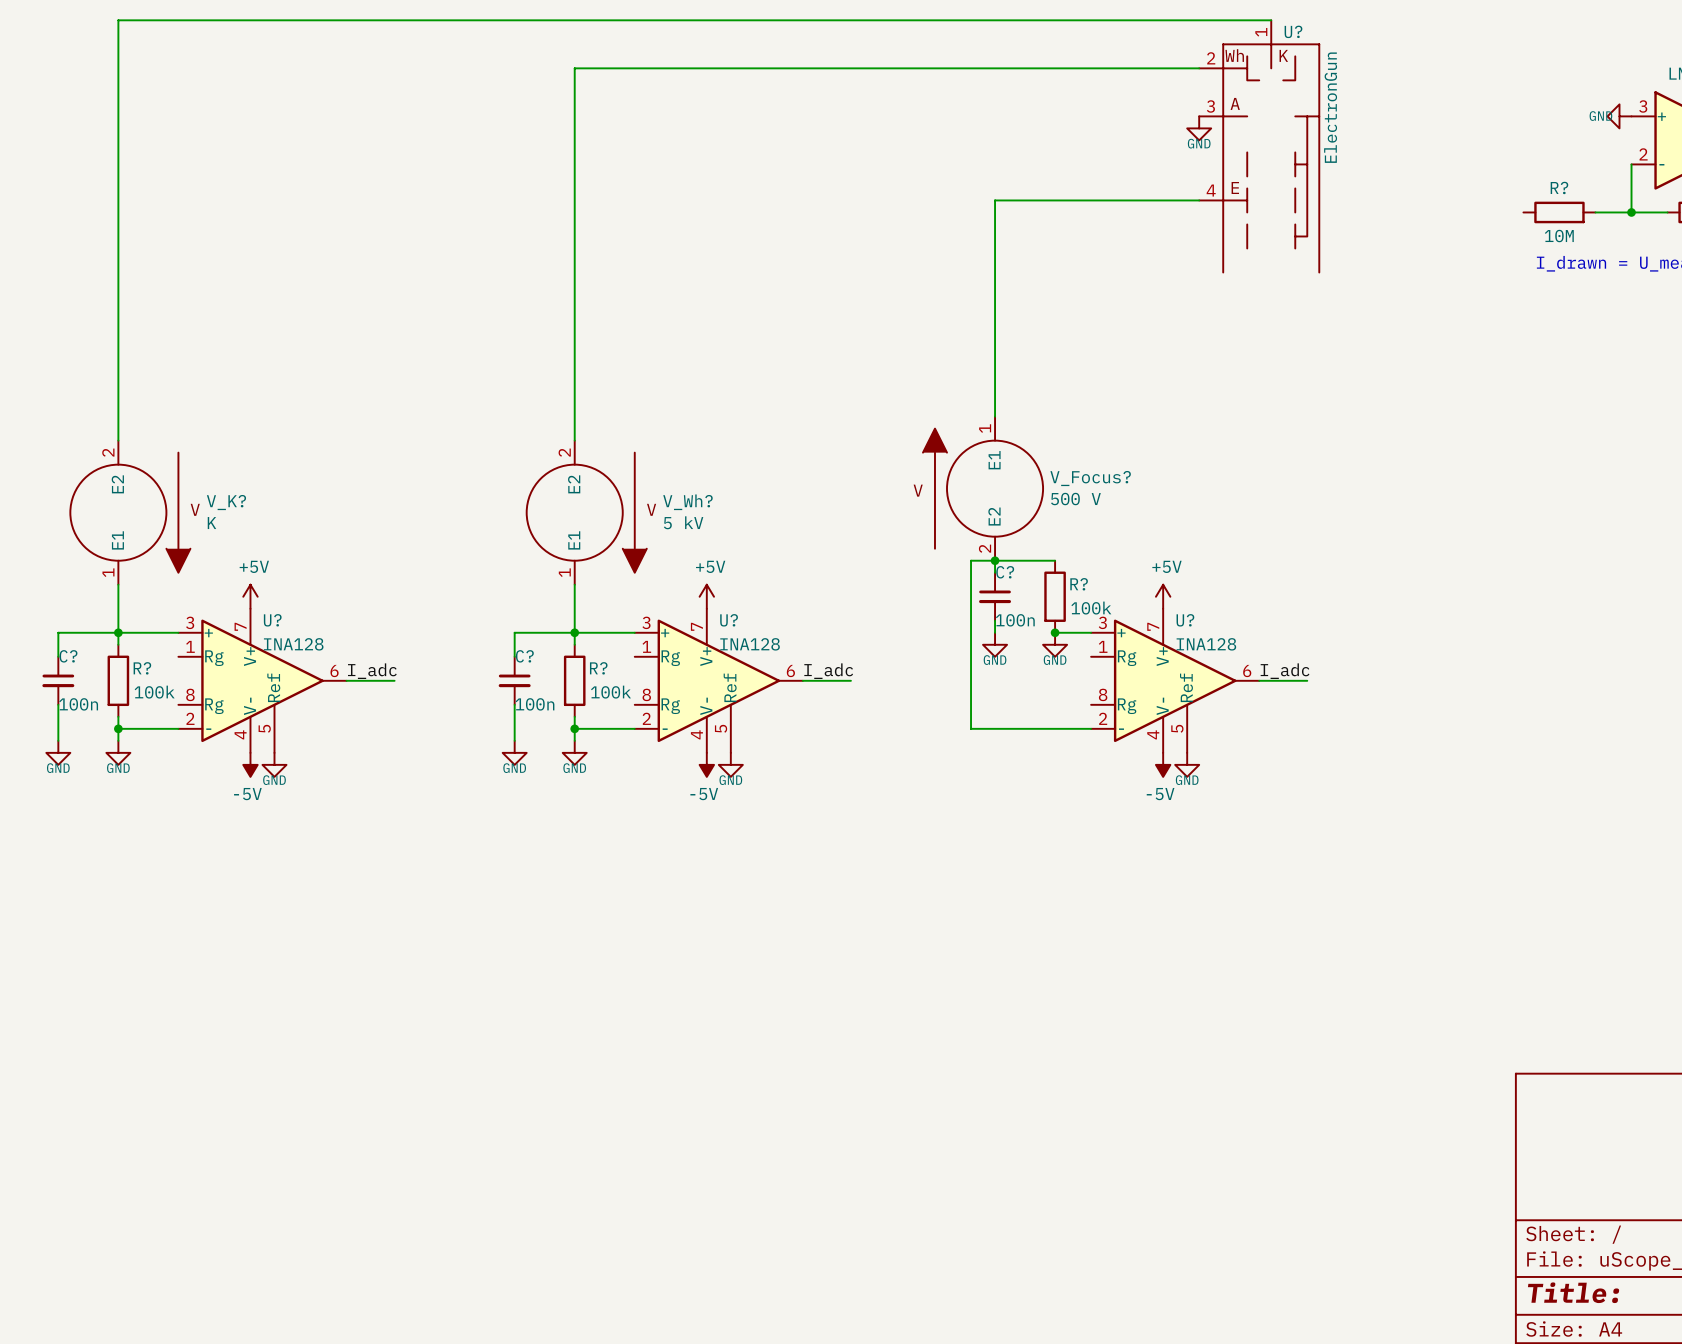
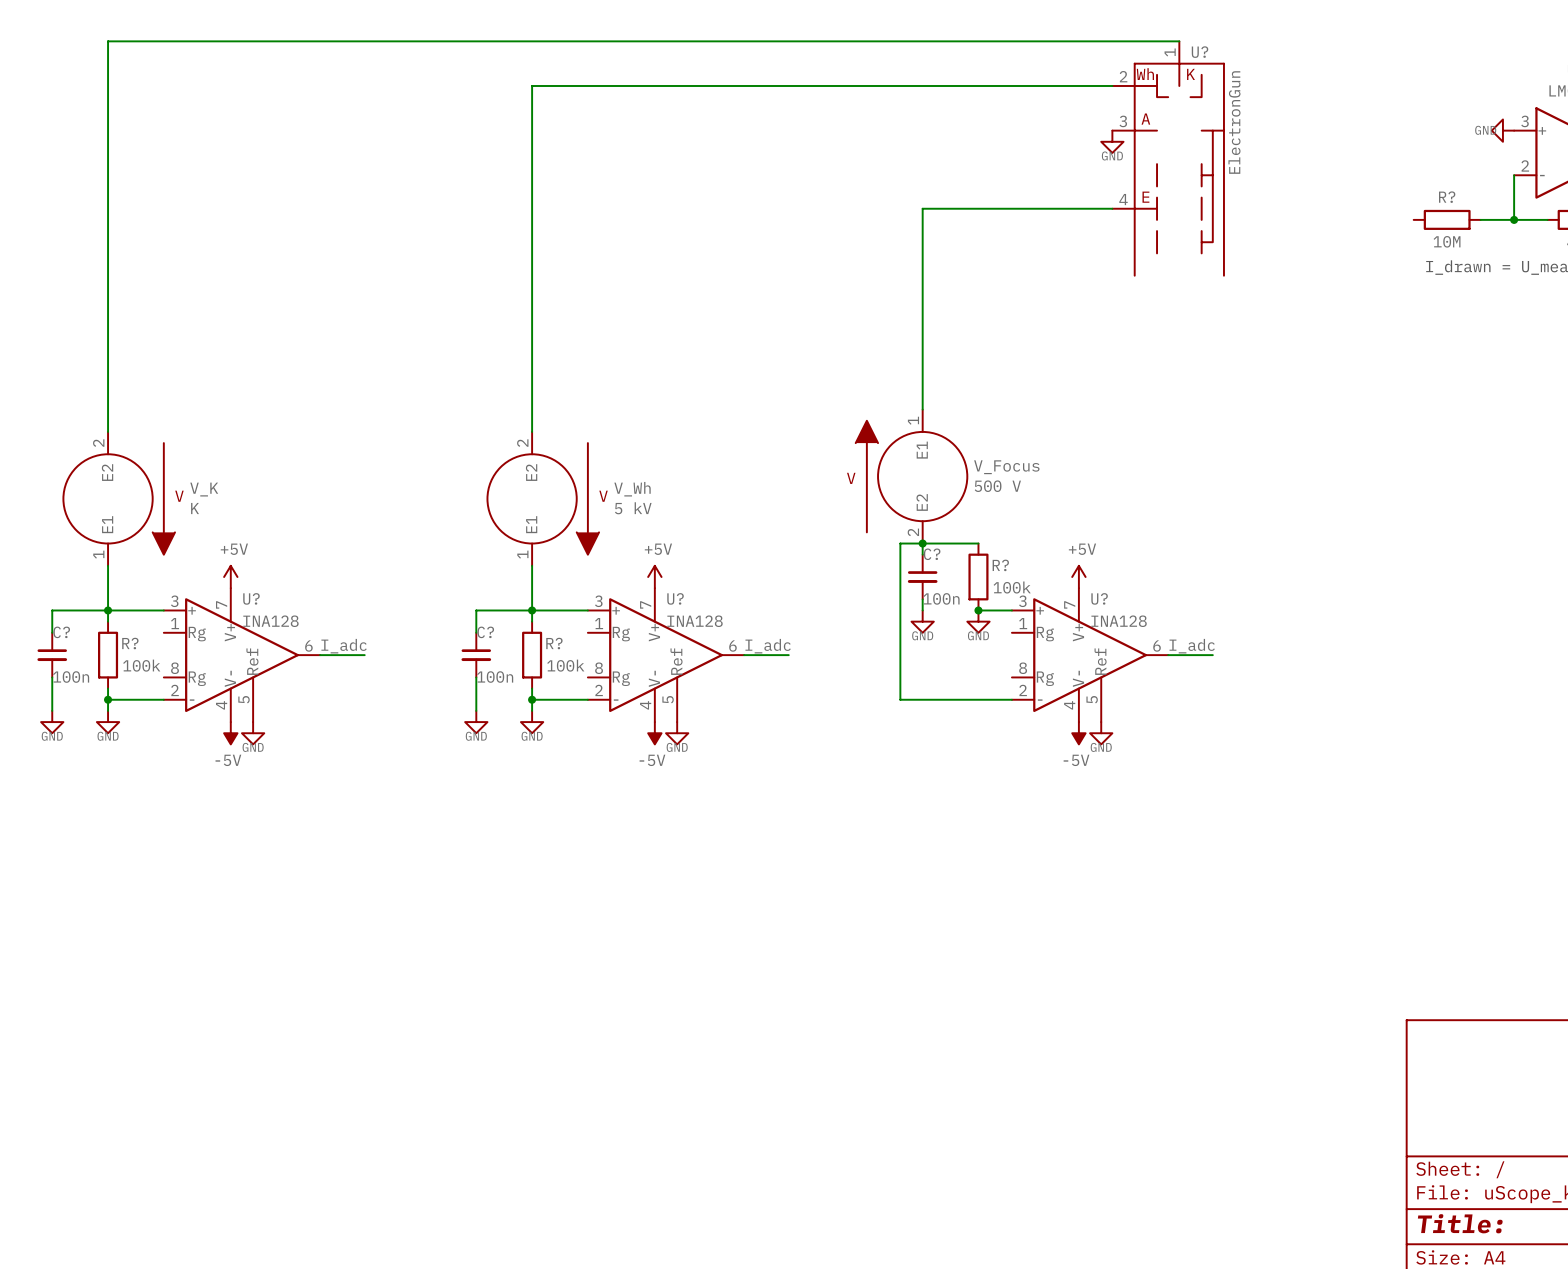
V_Focus? name: V_Focus? (1090, 478) -> V_Focus (1006, 467)
V_K? name: V_K? (226, 502) -> V_K (204, 489)
V_Wh? name: V_Wh? (687, 502) -> V_Wh (632, 489)

